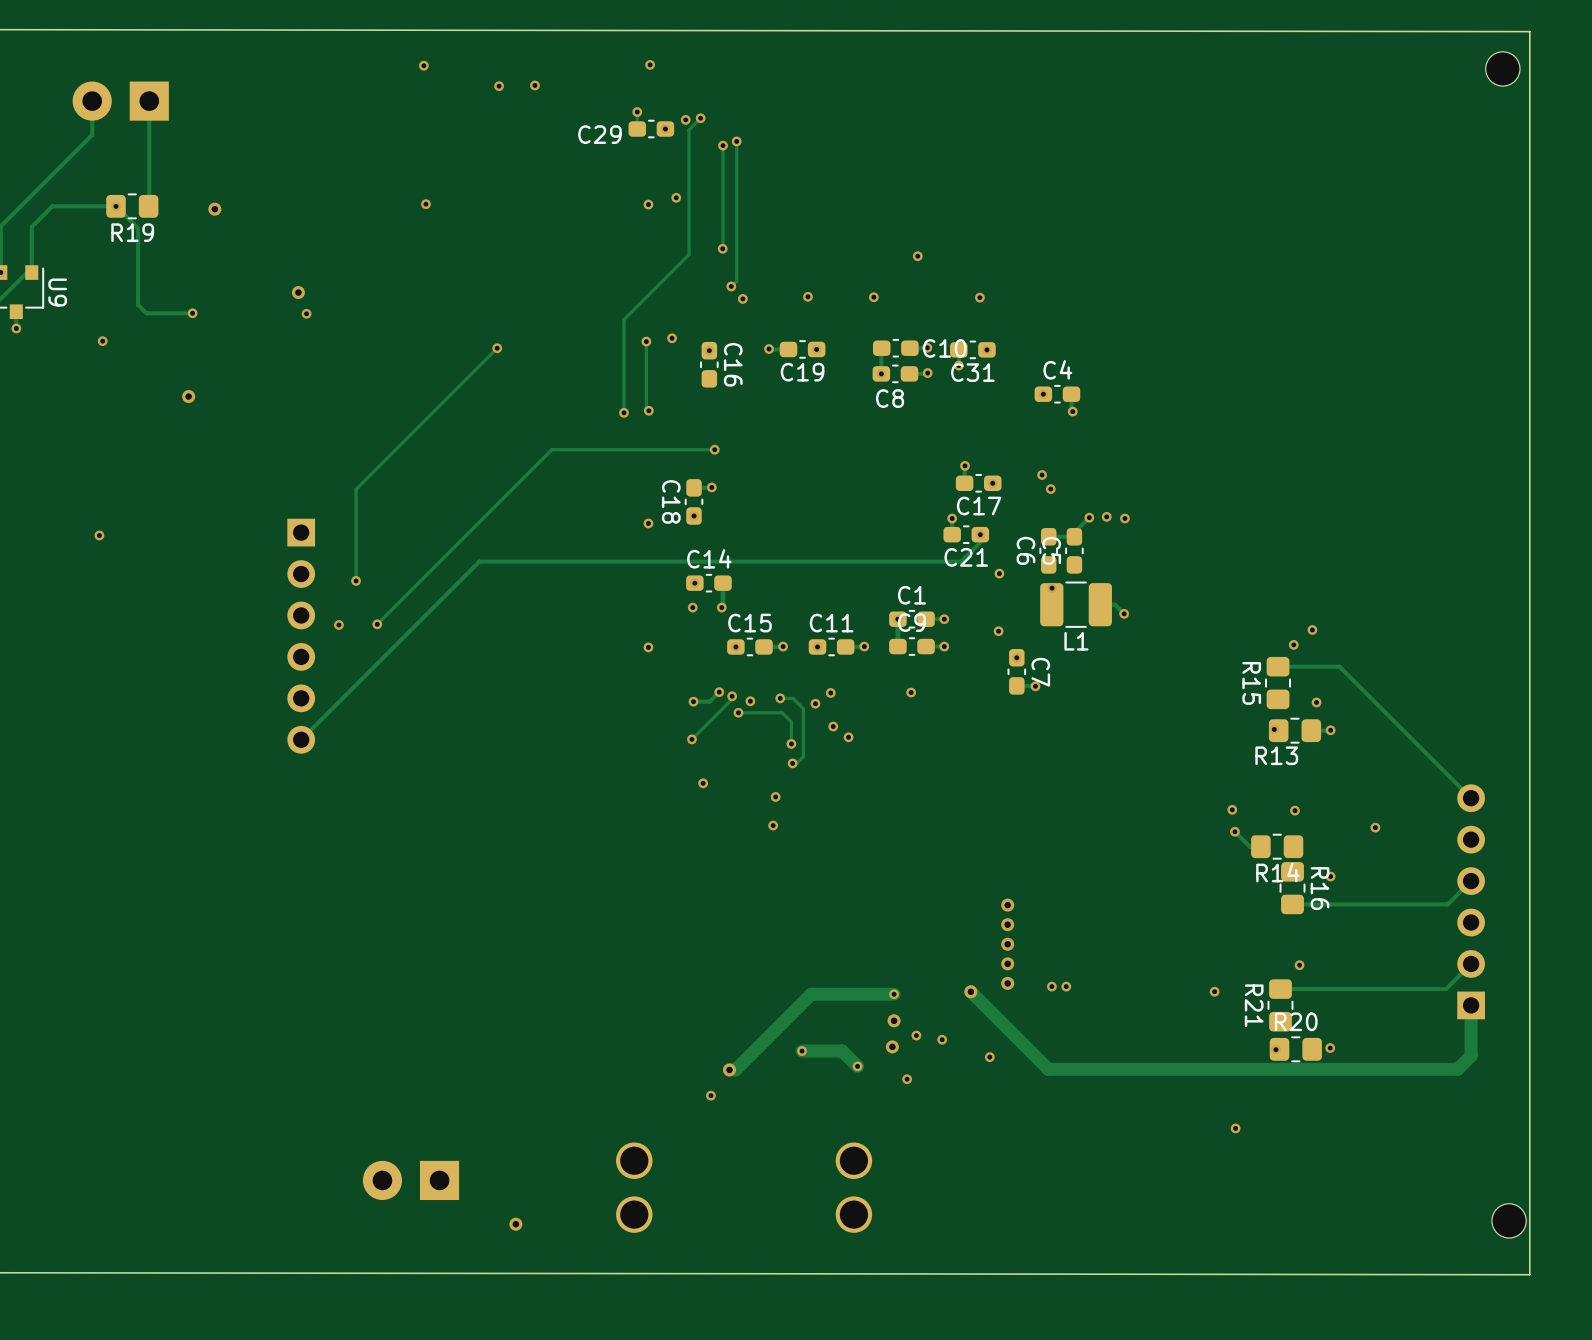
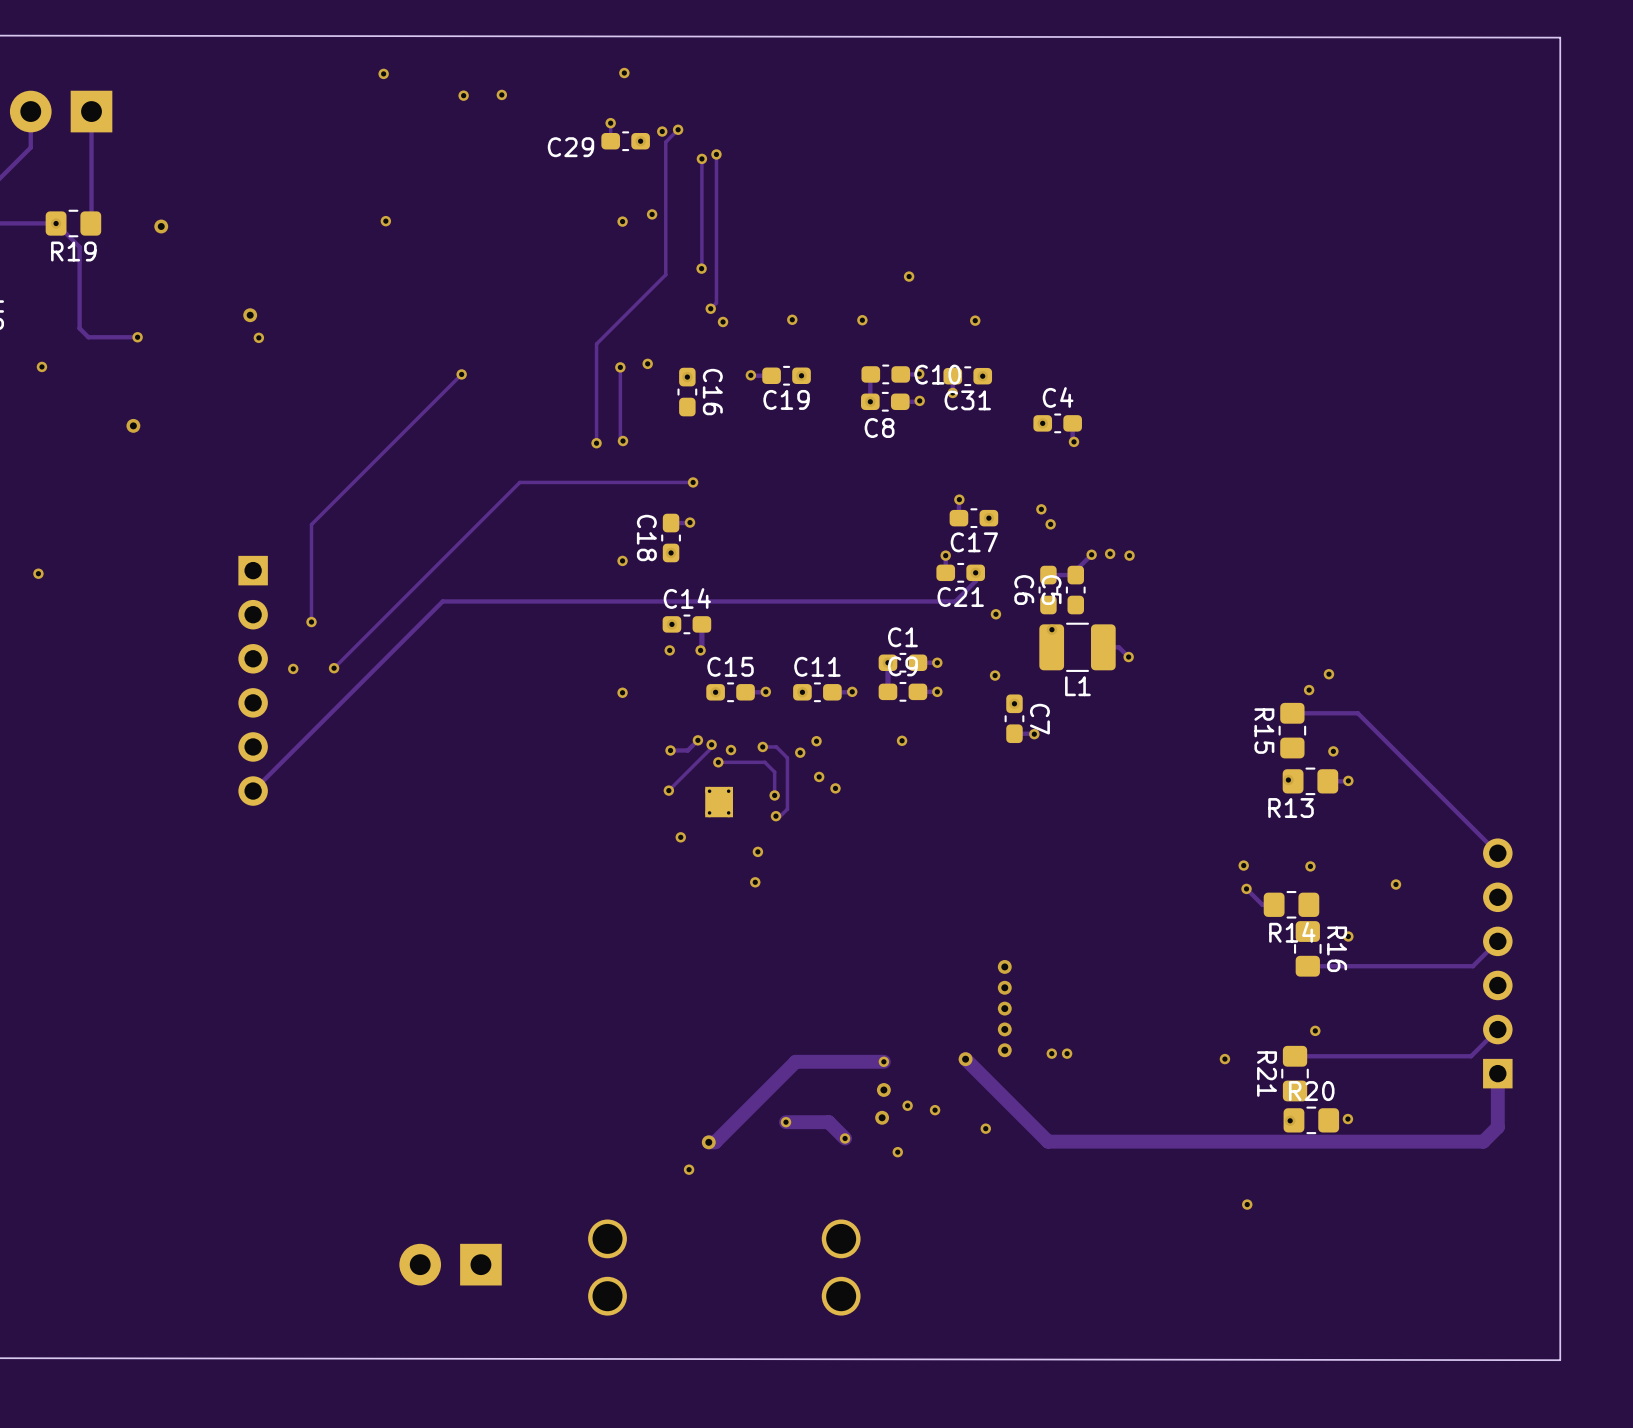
part: (1502, 68) -> none
part: none -> (719, 802)
part position: (411, 1180) -> (450, 1264)
part: (1509, 1220) -> none
via: (515, 1224) -> none

